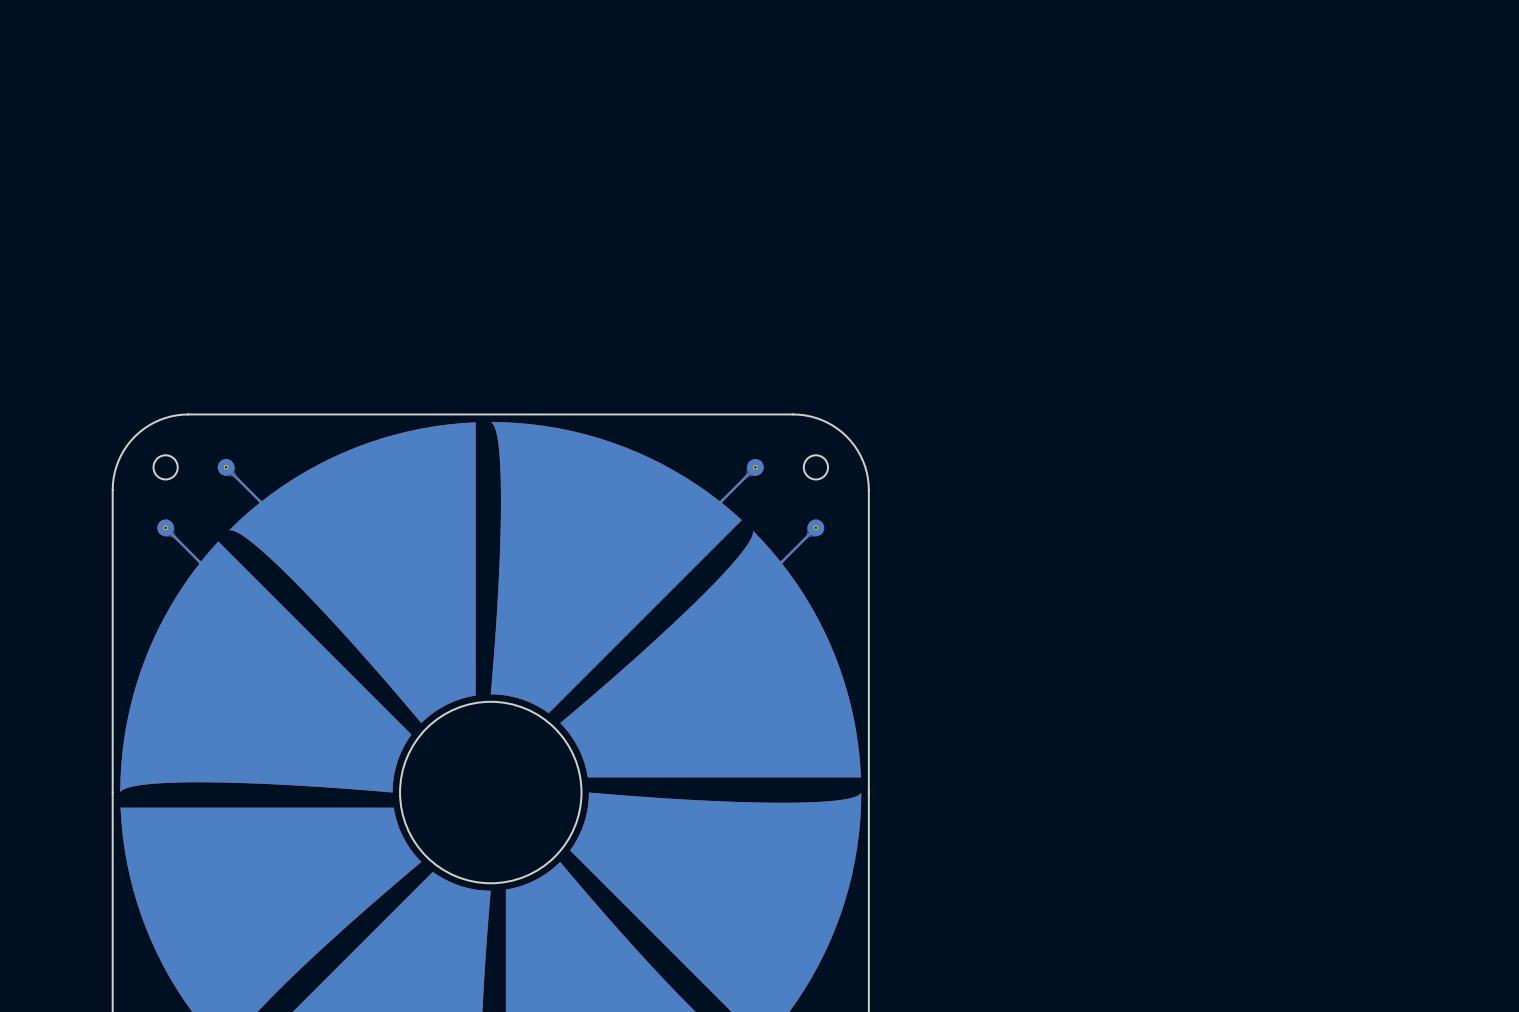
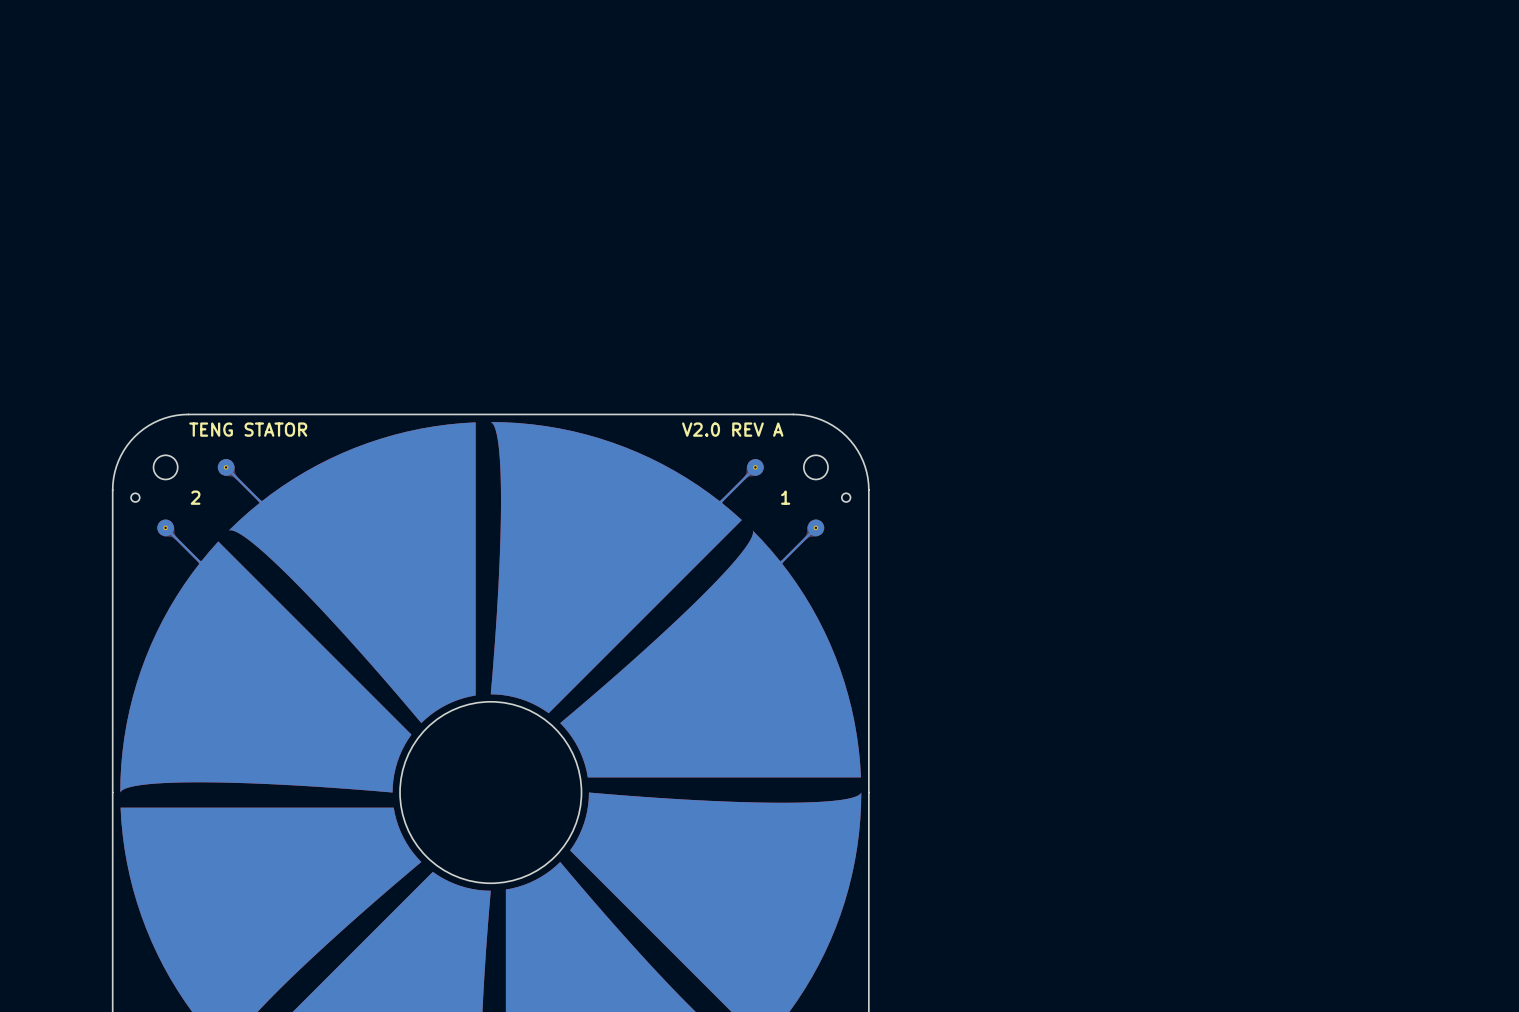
text: none -> TENG STATOR (248, 429)
text: none -> V2.0 REV A (732, 429)
part: none -> (135, 497)
text: none -> 2 (195, 497)
text: none -> 1 (785, 497)
part: none -> (846, 497)

